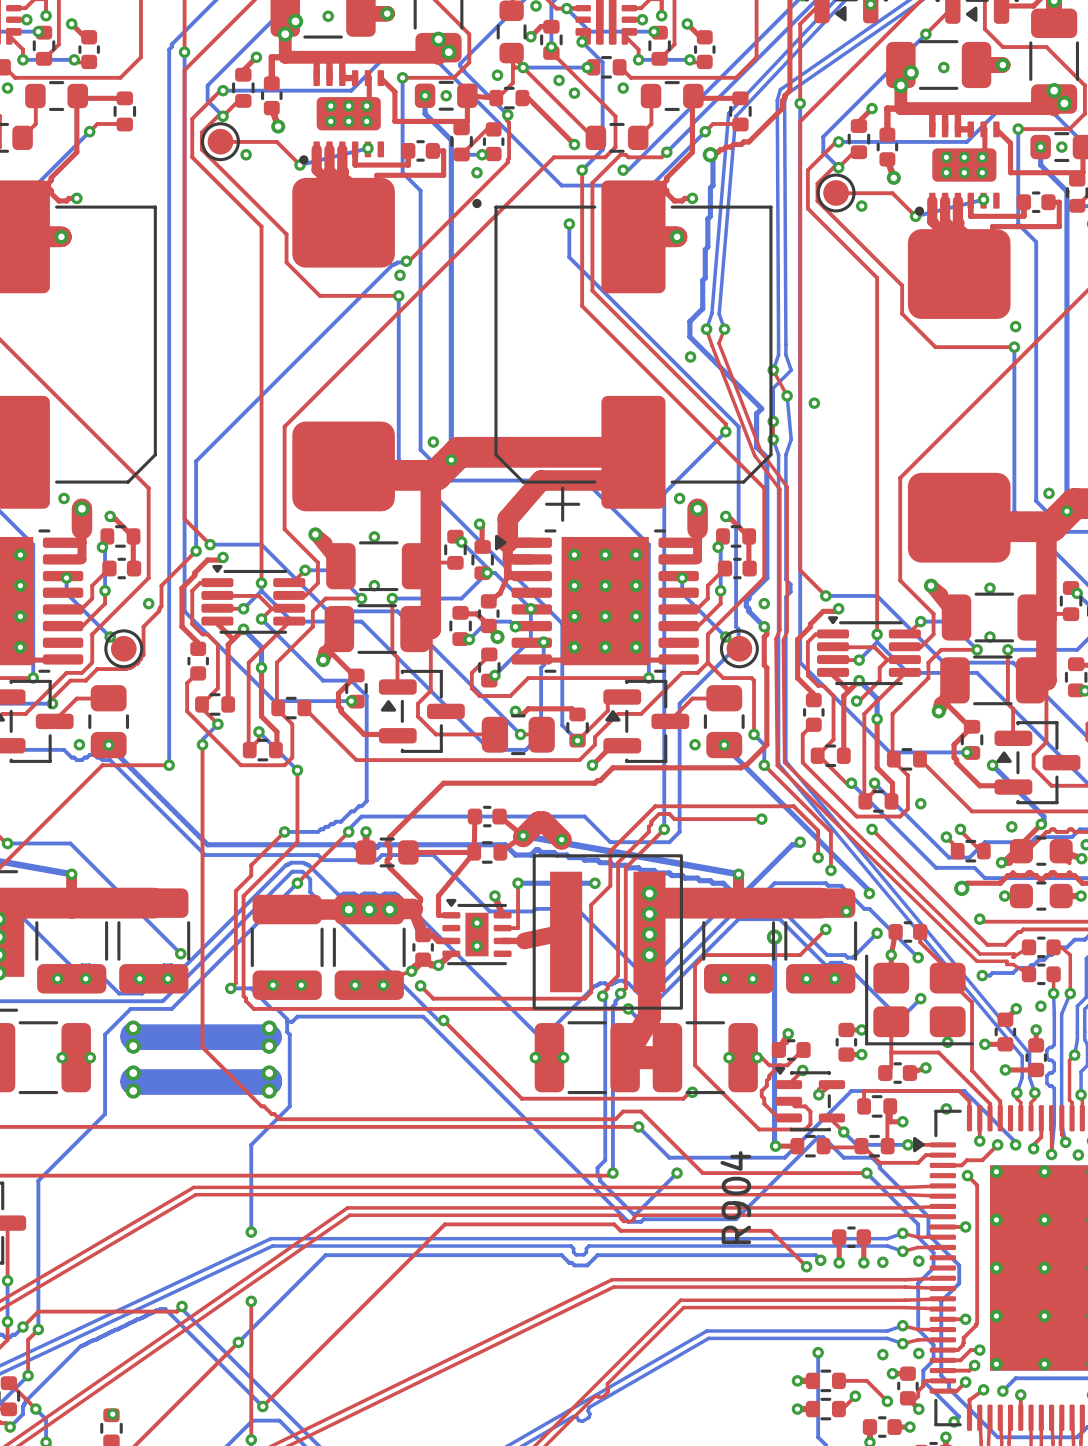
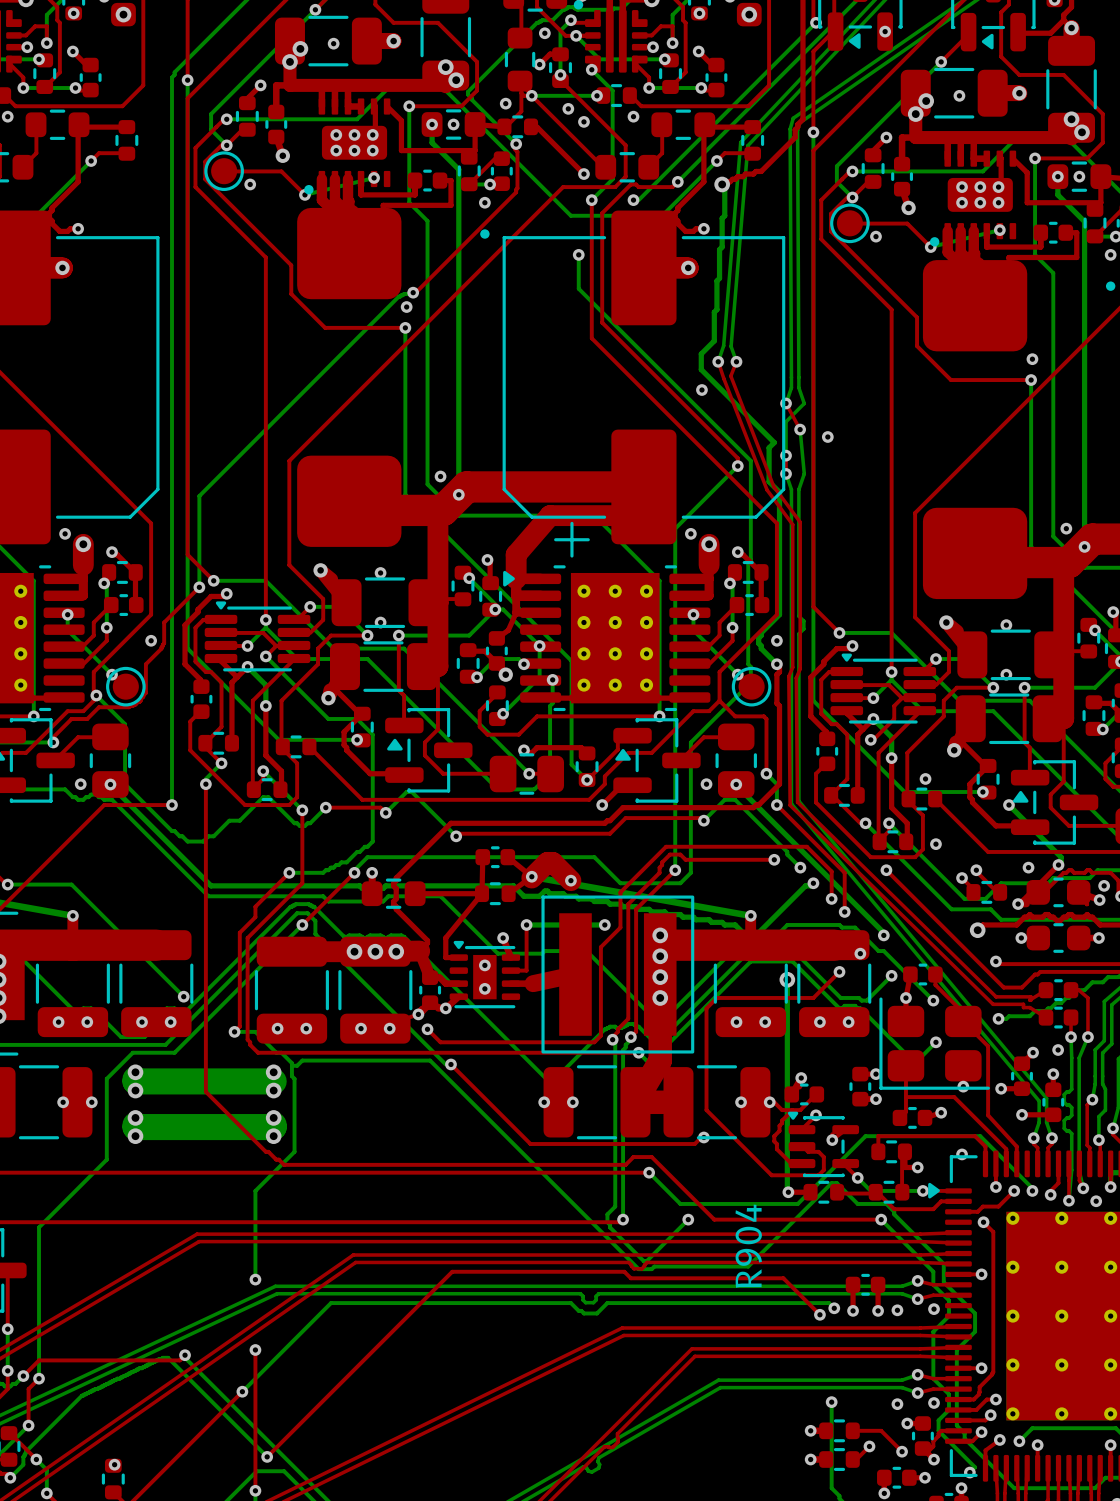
bottom track: none -> (96, 695) (125, 724) (125, 784) (171, 831) (187, 841) (203, 841) (208, 836) (213, 836) (229, 820) (239, 820) (263, 797) (268, 797) (294, 823) (299, 825) (310, 823) (325, 807)
via: none -> (96, 695)
via: none -> (925, 778)
top track: none -> (325, 807) (380, 807) (385, 812)
via: none -> (325, 807)
bottom track: none -> (385, 812) (406, 792) (411, 792) (456, 836)
via: none -> (385, 812)
top track: none -> (701, 818) (625, 818) (610, 833) (458, 833)
bottom track: none -> (703, 820) (724, 799) (735, 799) (800, 867)
via: none -> (703, 820)
via: none -> (456, 836)
via: none -> (800, 867)

